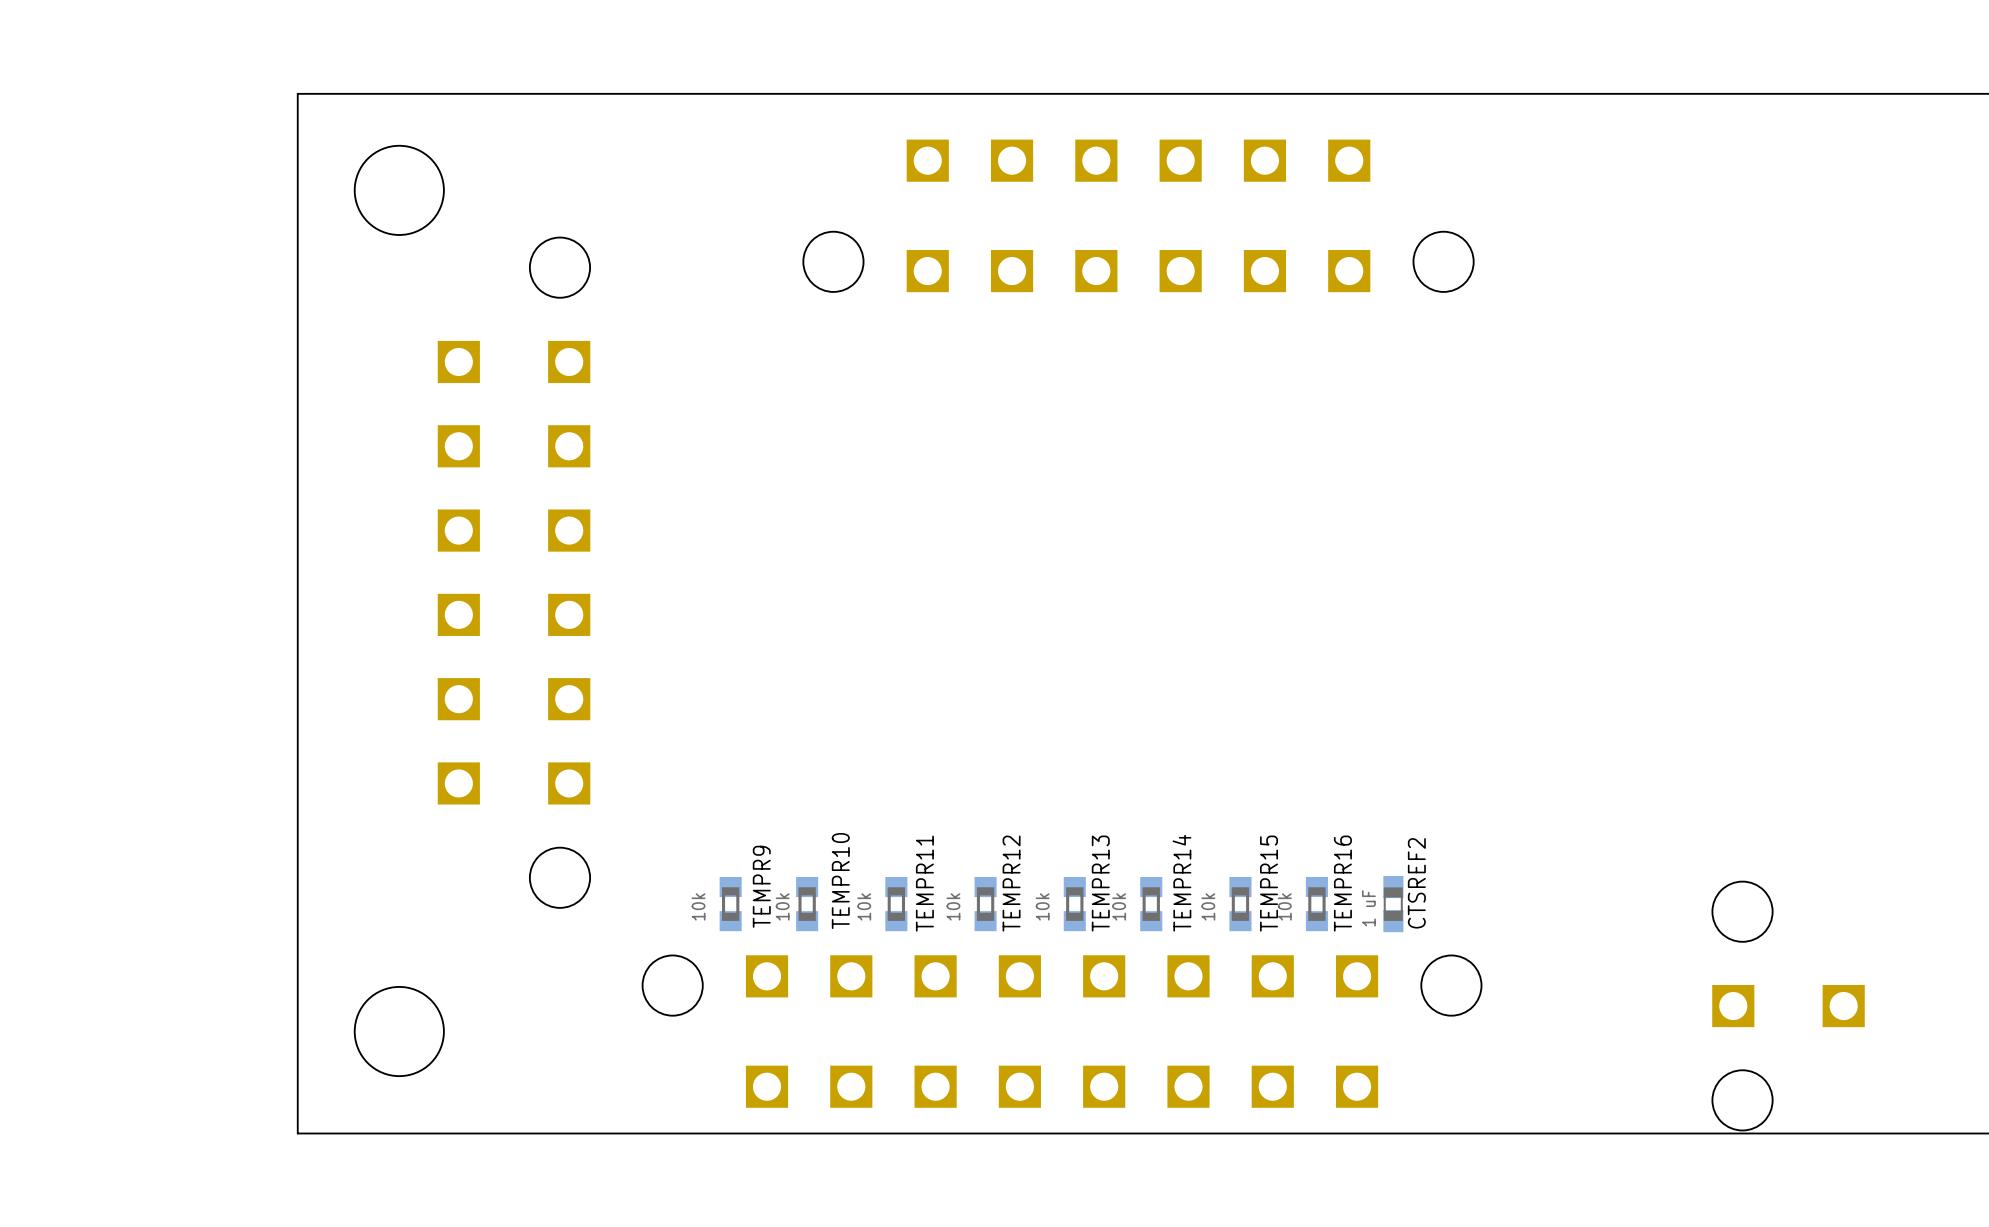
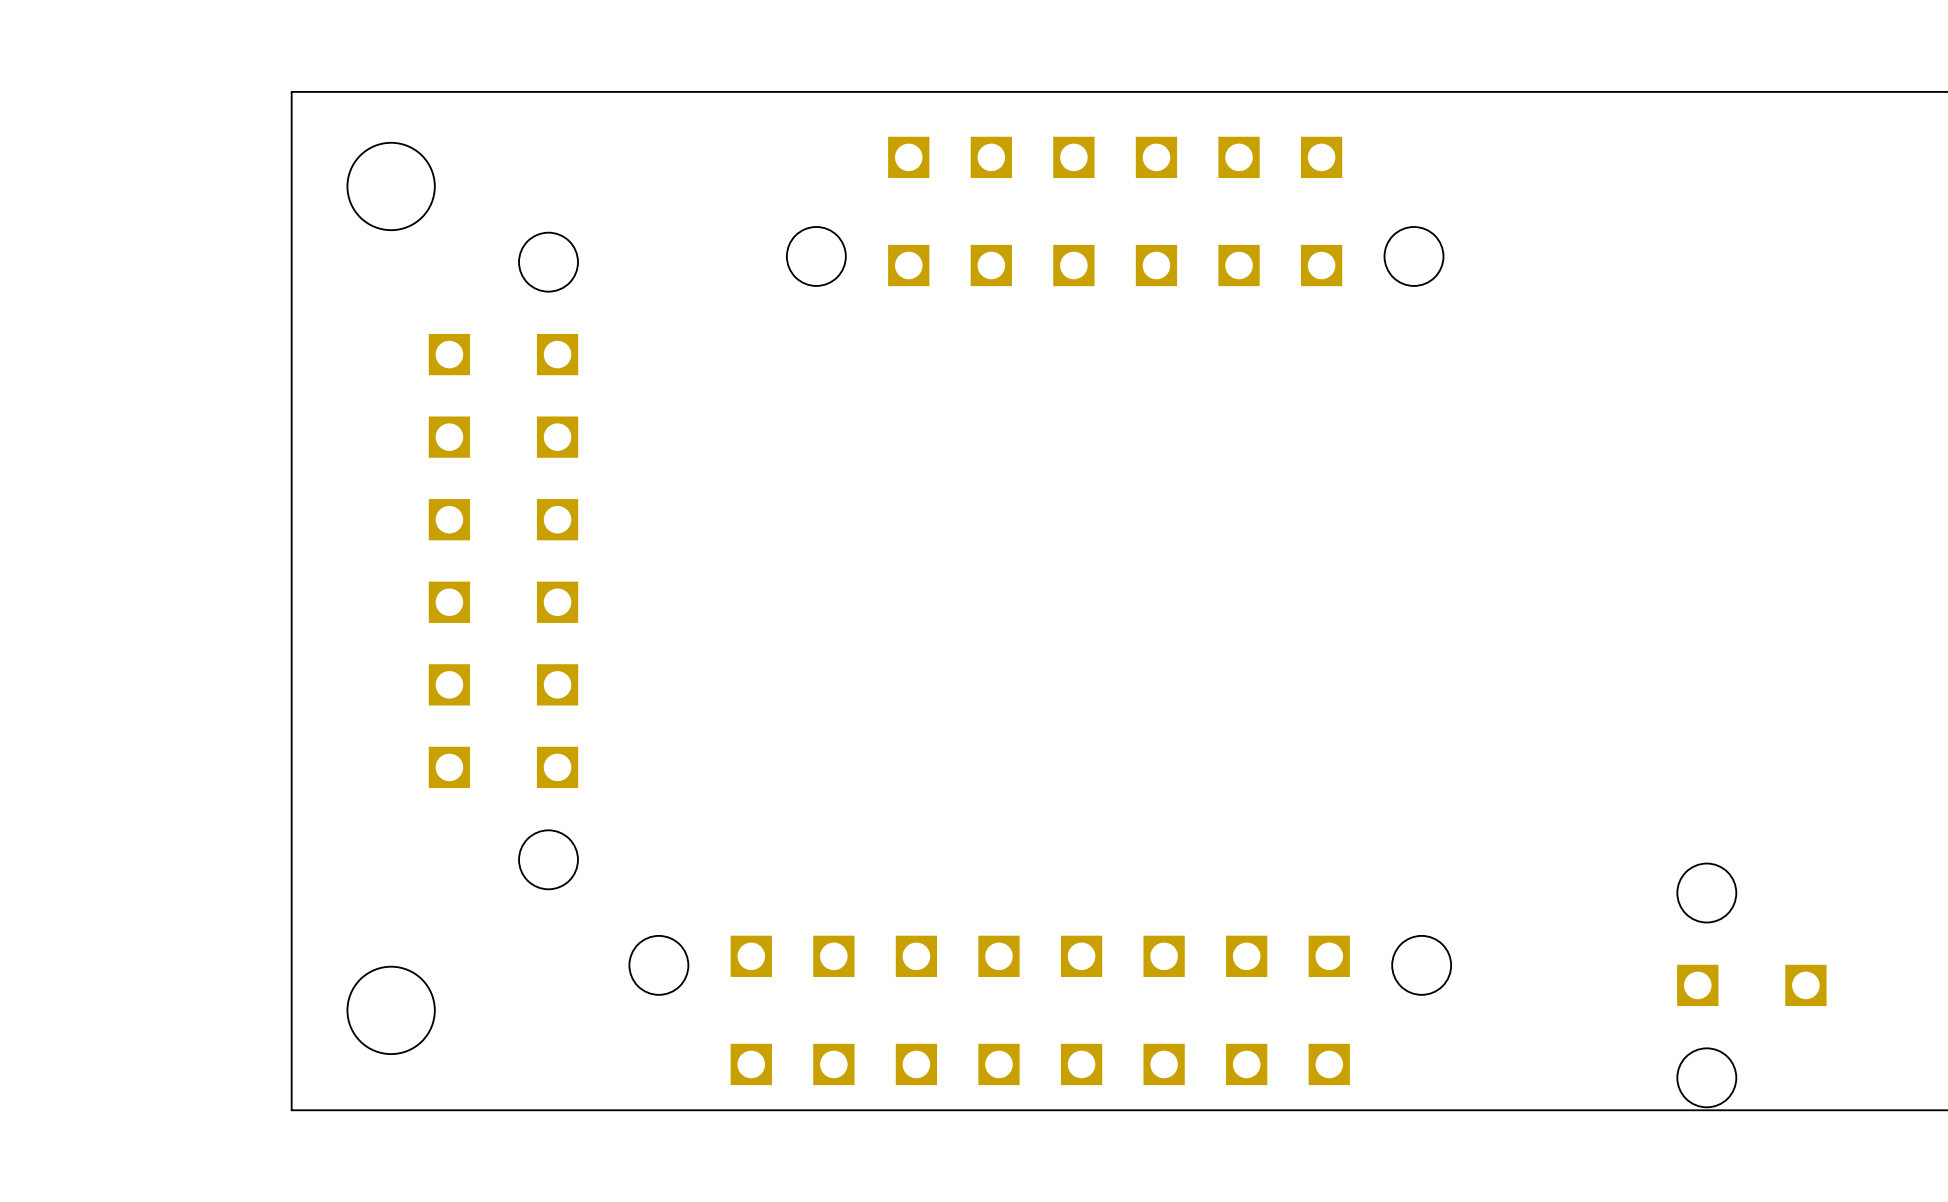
TEMPR9: 10k (730, 904) -> none
TEMPR10: 10k (807, 904) -> none
TEMPR11: 10k (896, 904) -> none
TEMPR12: 10k (985, 904) -> none
TEMPR13: 10k (1074, 904) -> none
TEMPR14: 10k (1151, 904) -> none
TEMPR15: 10k (1240, 904) -> none
TEMPR16: 10k (1316, 904) -> none
CTSREF2: 1 uF (1393, 904) -> none

